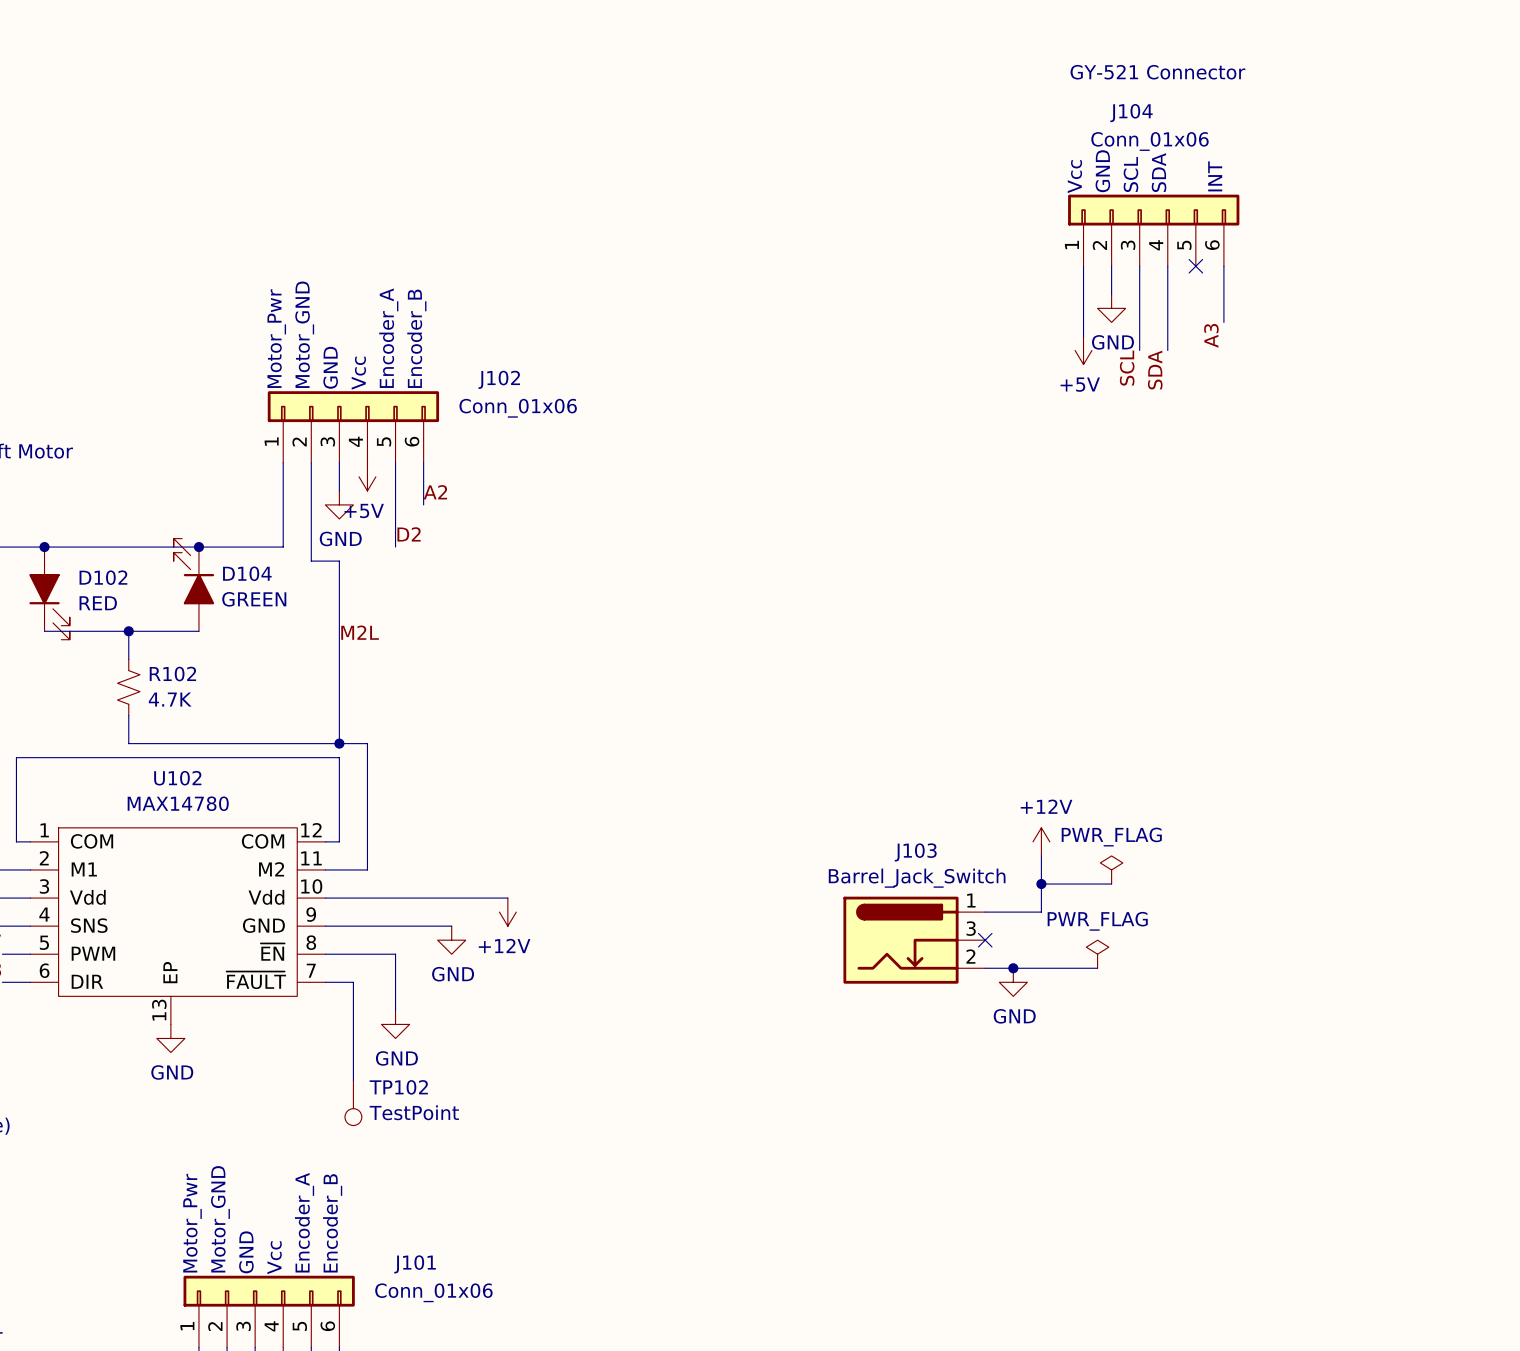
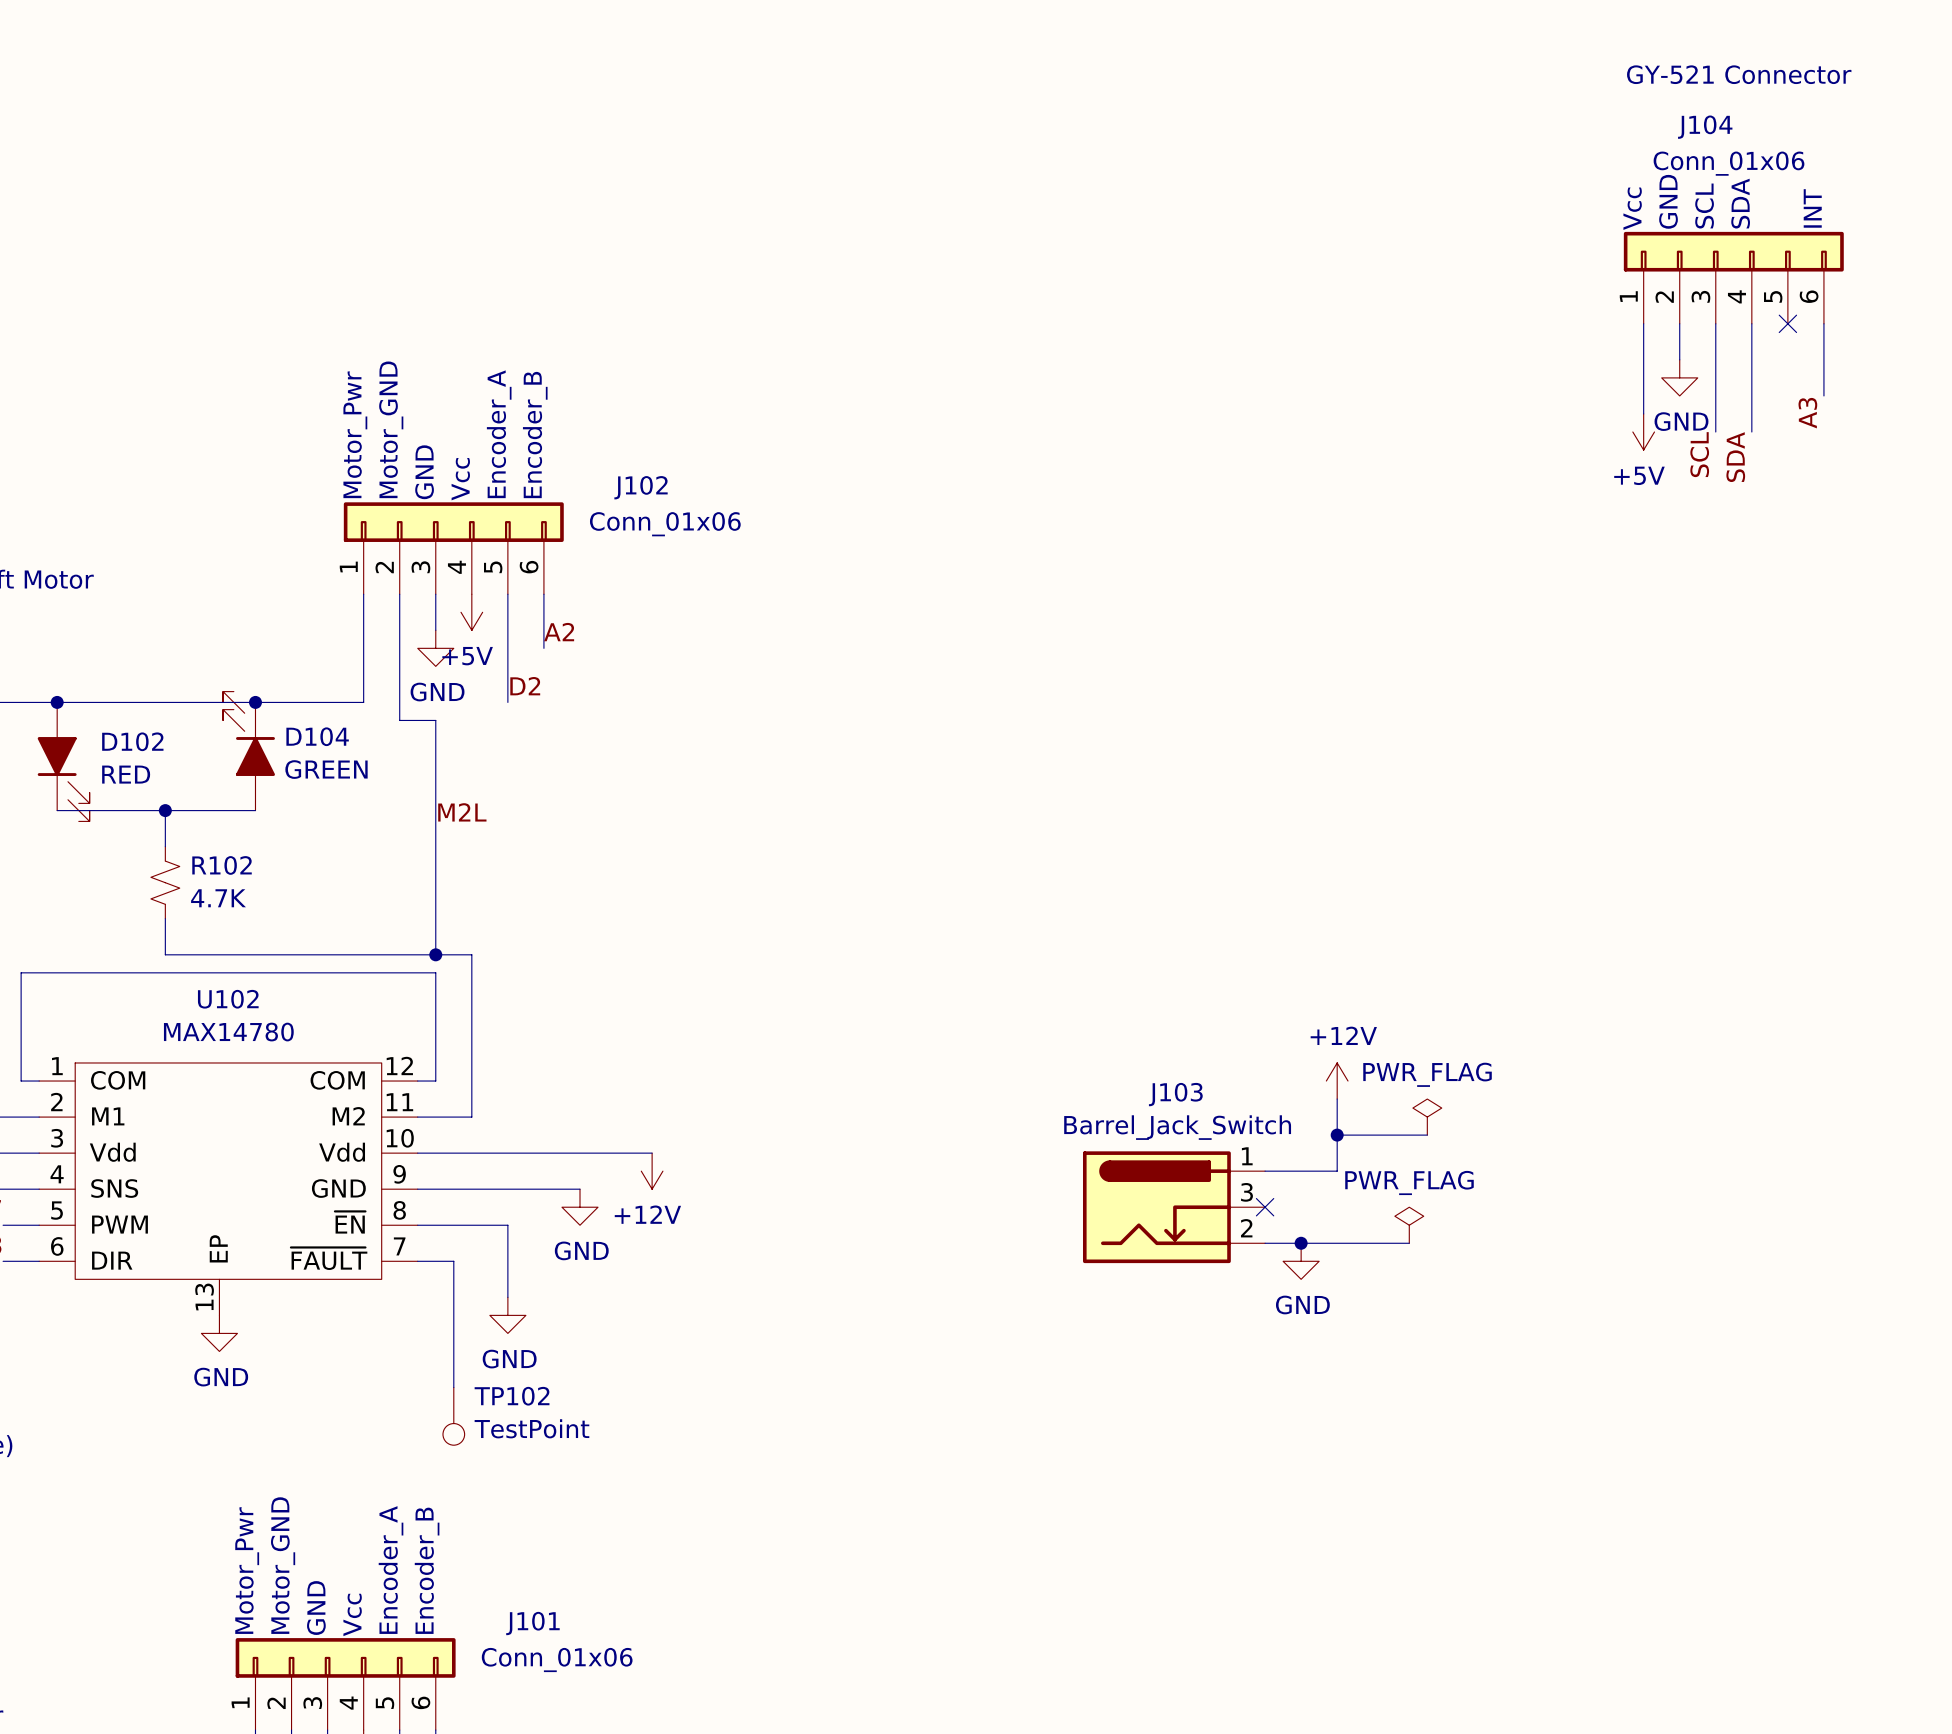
text position: GY-521 Connector (1157, 72) -> GY-521 Connector (1739, 74)
text position: GND (1102, 171) -> GND (1668, 201)
text position: SDA (1159, 172) -> SDA (1740, 203)
text position: SCL (1130, 174) -> SCL (1704, 206)
text position: Vcc (1074, 176) -> Vcc (1632, 208)
text position: INT (1215, 176) -> INT (1812, 208)
J104 position: (1153, 230) -> (1733, 277)
no-connect mark: none -> (1787, 323)
wire: (1083, 266) (1083, 336) -> (1643, 323) (1643, 413)
wire: (1111, 266) (1111, 294) -> (1679, 323) (1679, 359)
wire: (1139, 266) (1139, 350) -> (1715, 323) (1715, 432)
wire: (1167, 266) (1167, 350) -> (1751, 323) (1751, 432)
no-connect mark: (1195, 266) -> none
wire: (1223, 266) (1223, 322) -> (1823, 323) (1823, 395)
power symbol position: GND (1111, 308) -> GND (1679, 377)
label position: A3 (1211, 335) -> A3 (1807, 413)
power symbol position: +5V (1083, 350) -> +5V (1643, 432)
label position: SCL (1127, 368) -> SCL (1699, 454)
label position: SDA (1155, 370) -> SDA (1735, 457)

